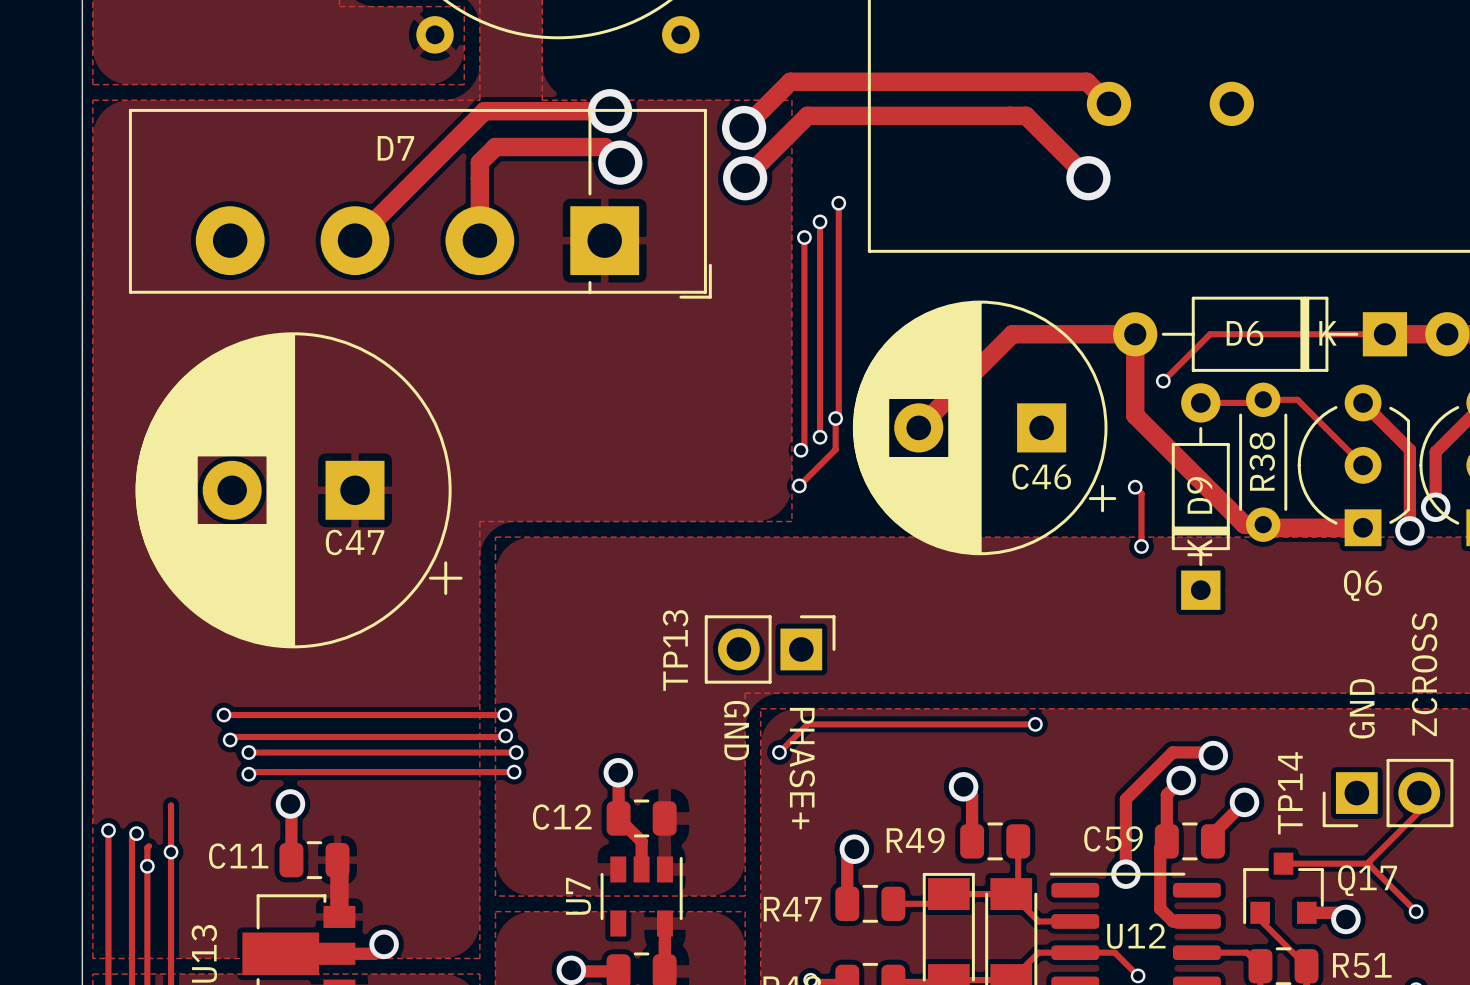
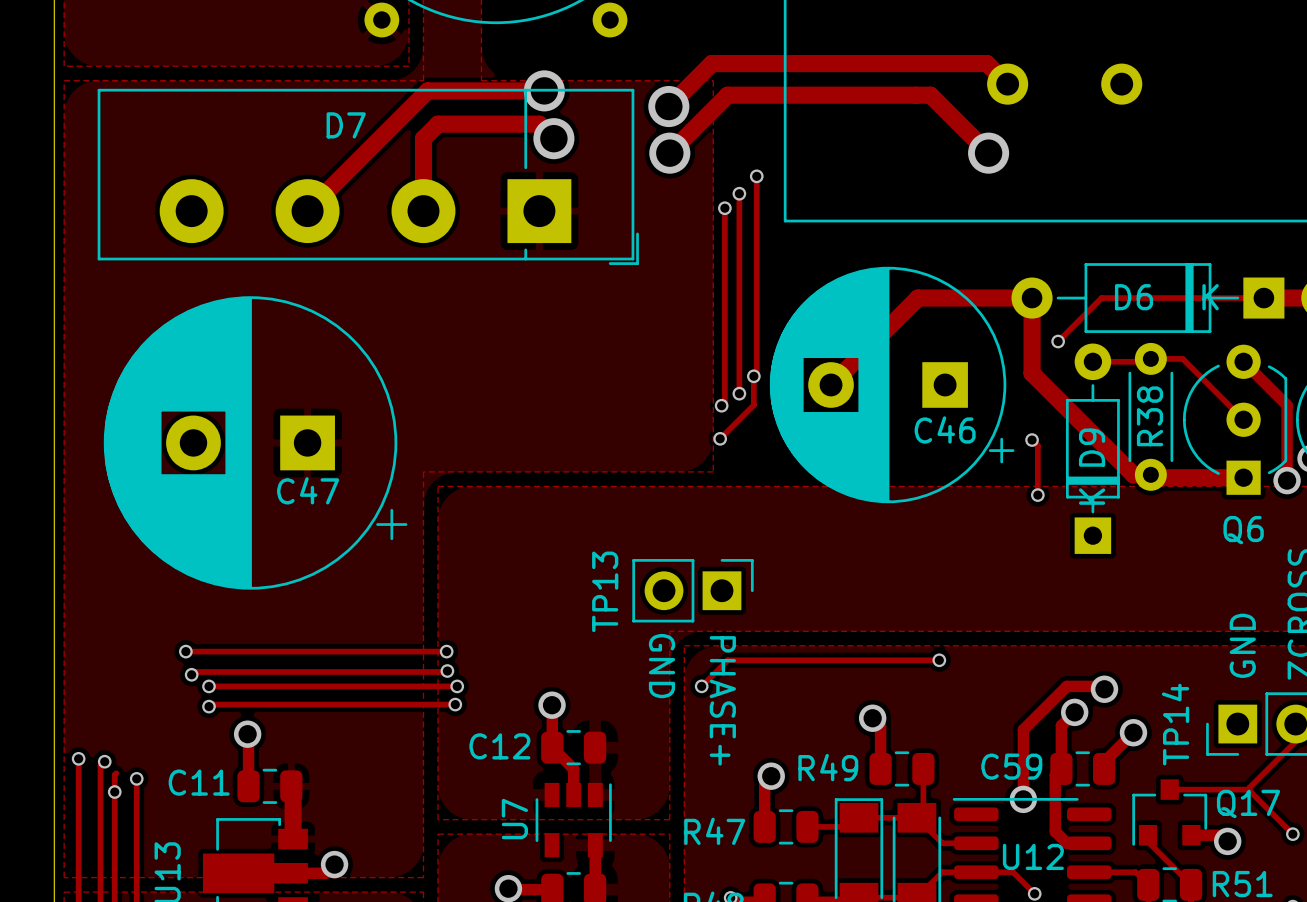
track: (171, 805) (171, 852) -> none

